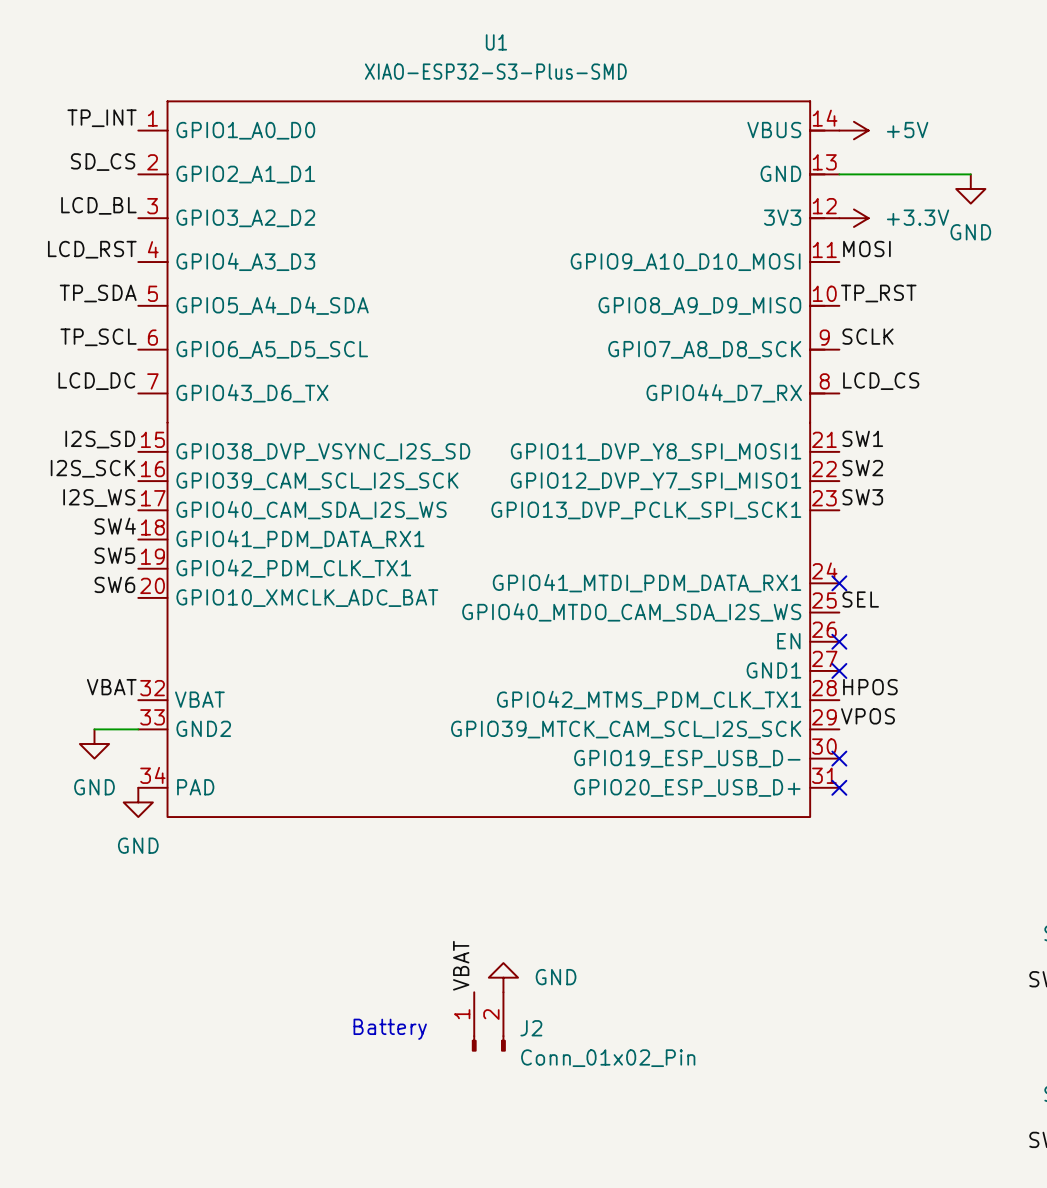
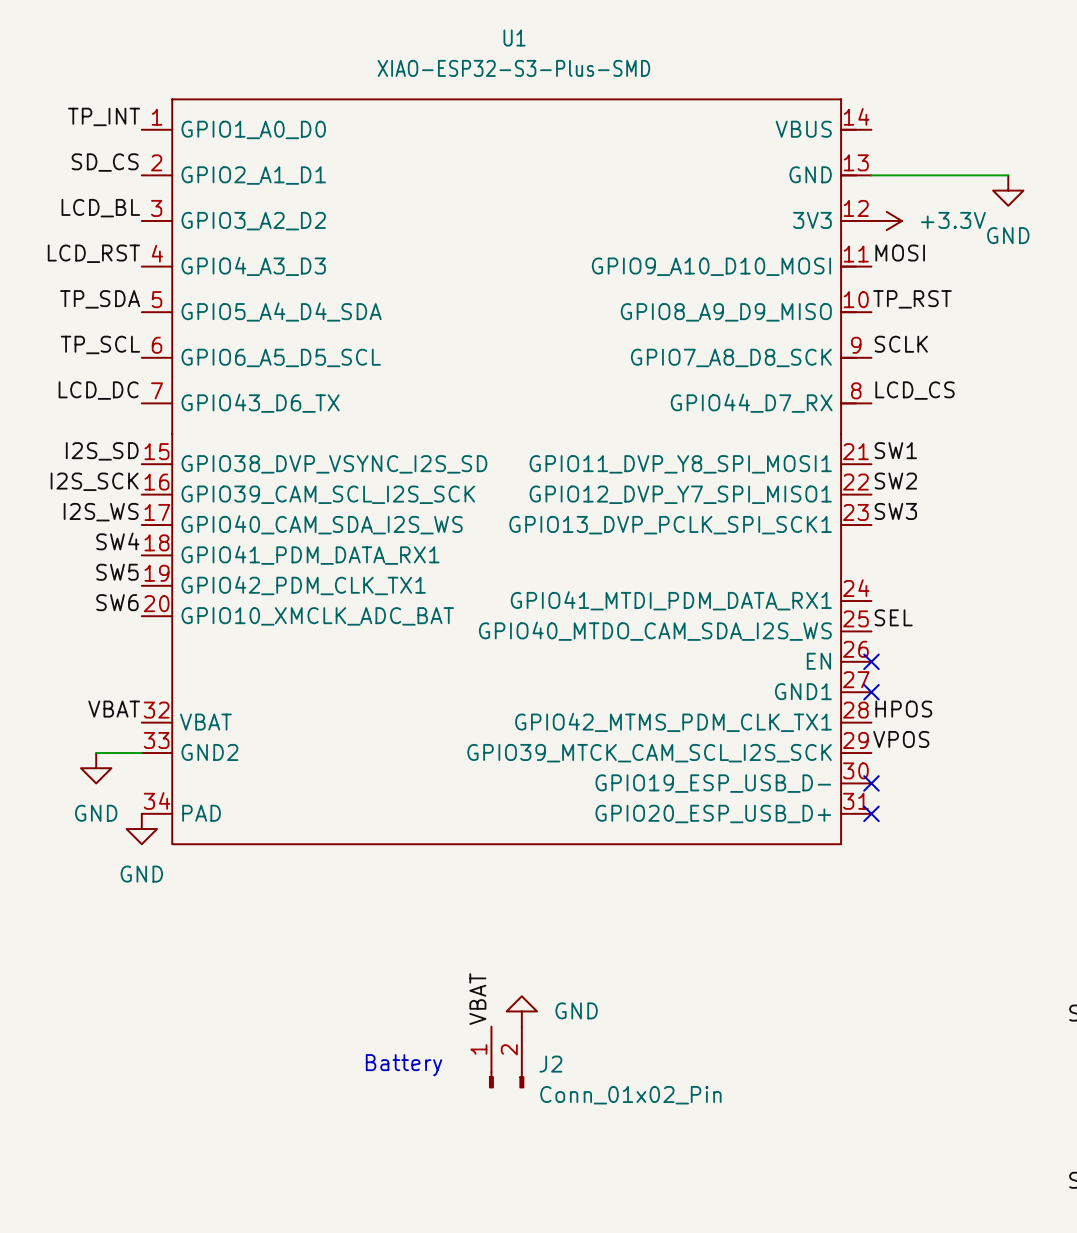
power symbol: +5V (853, 130) -> none
no-connect mark: (839, 583) -> none

